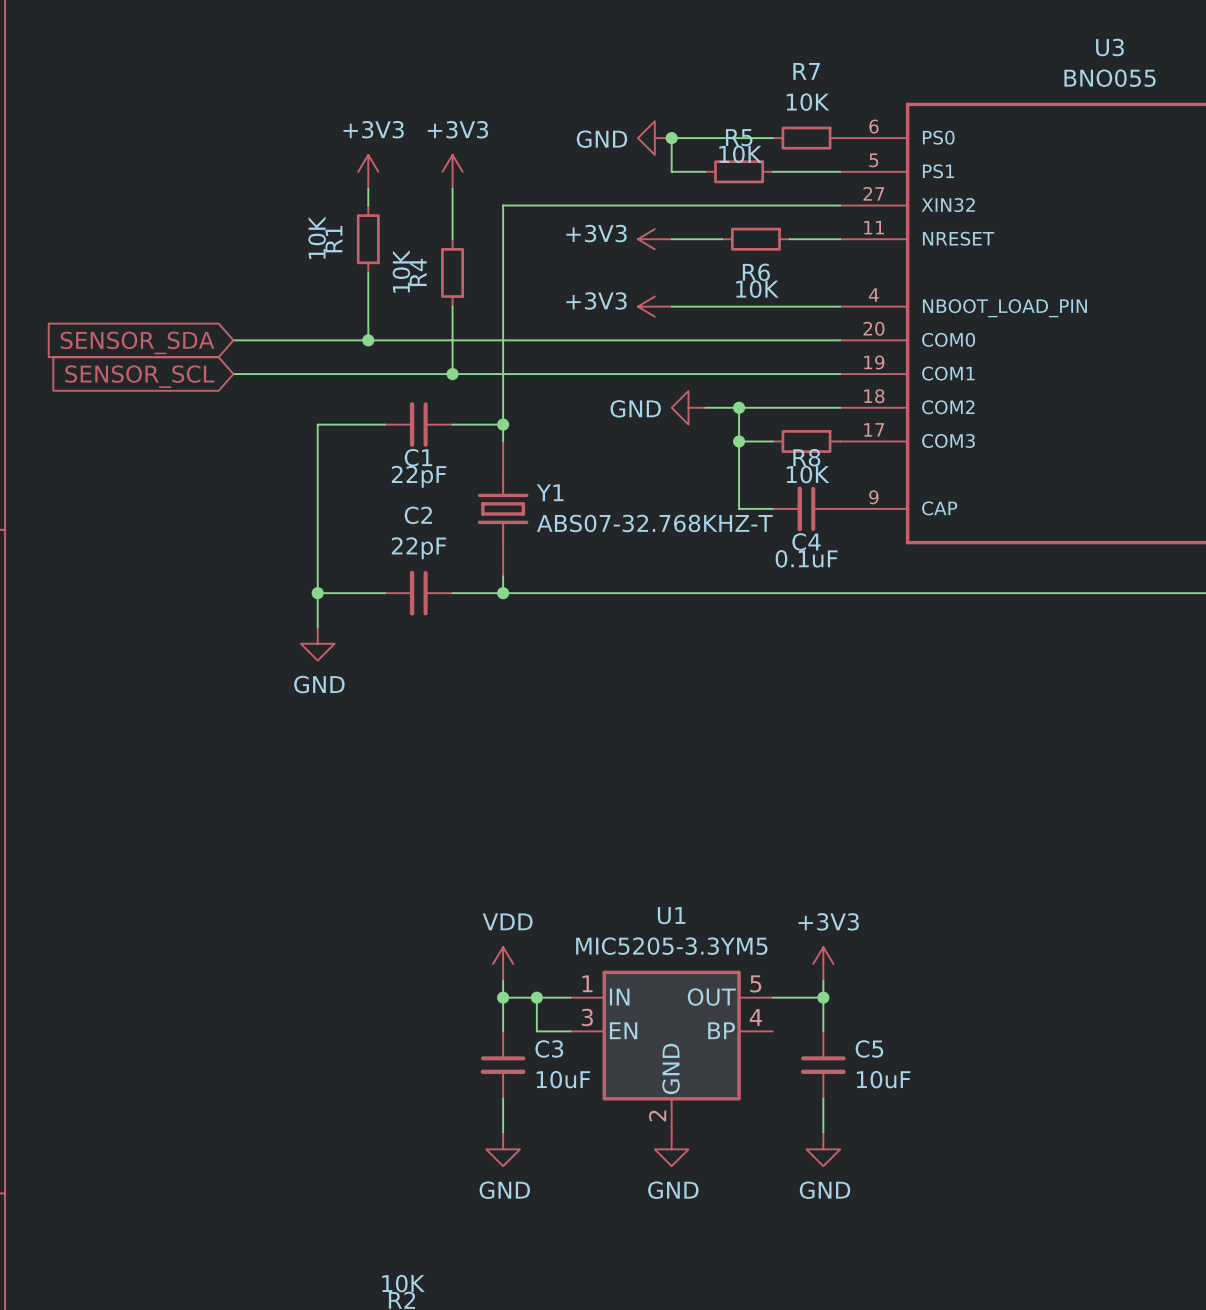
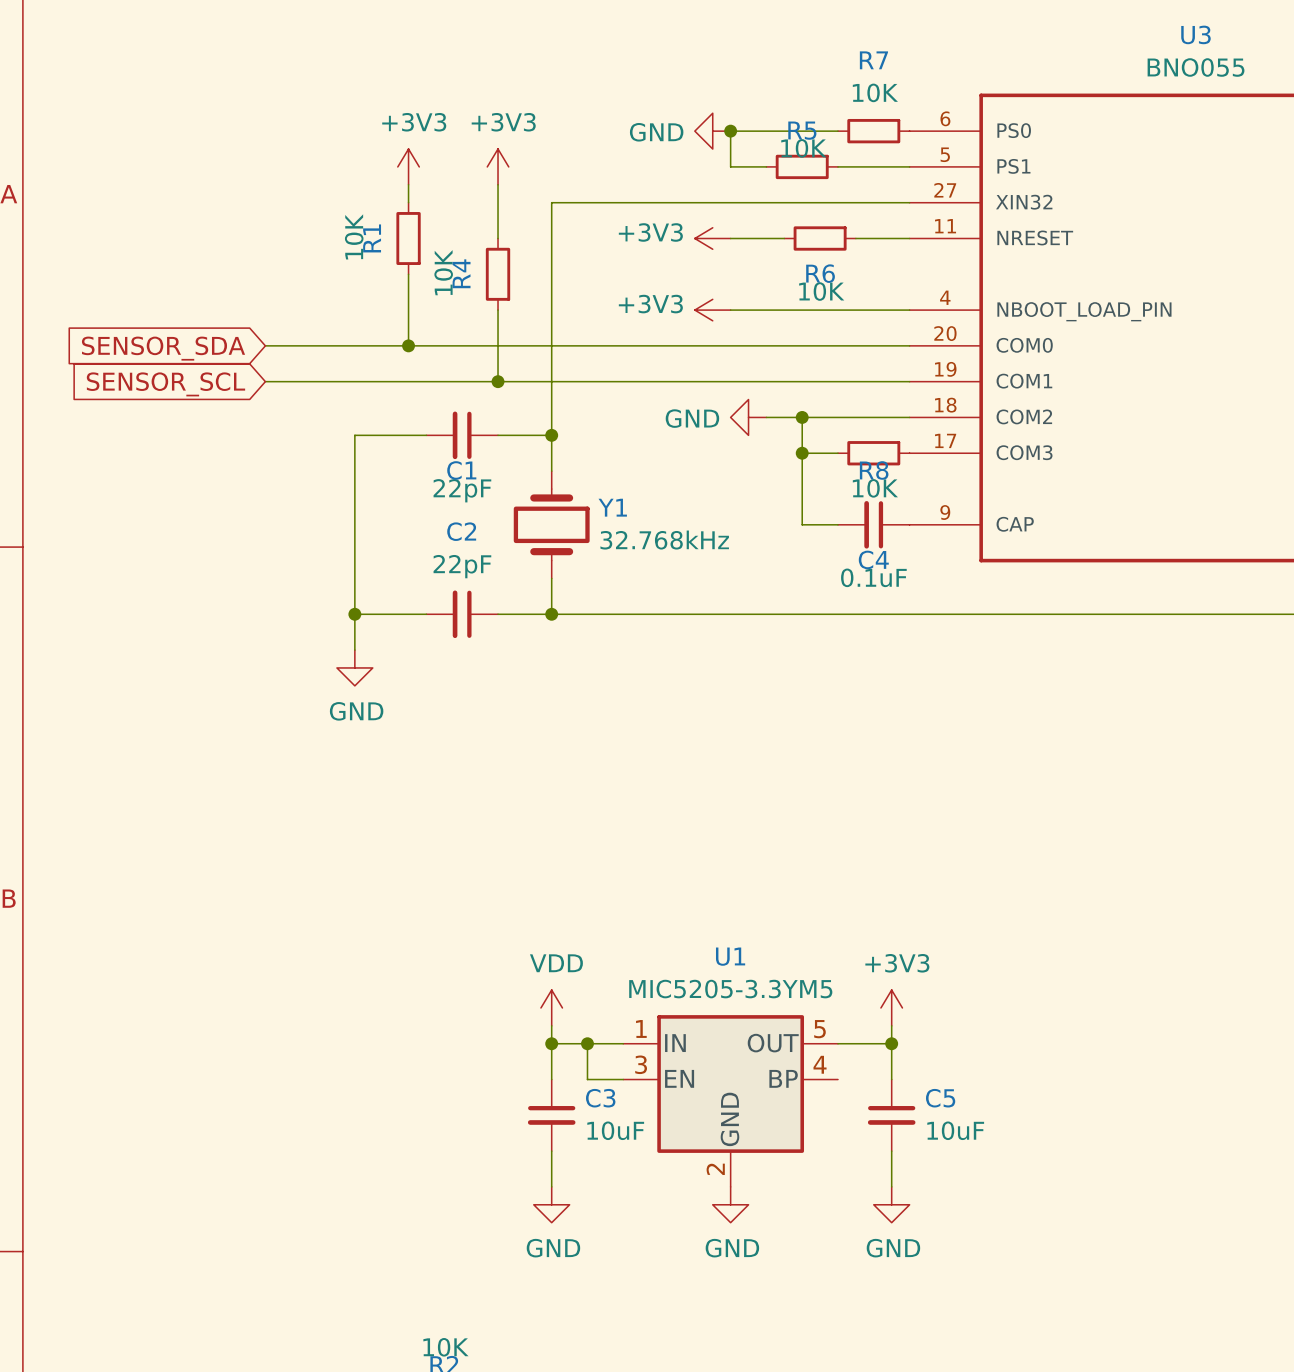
Y1 symbol: [477, 441, 529, 577] -> [513, 471, 590, 579]
Y1 value: ABS07-32.768KHZ-T (654, 523) -> 32.768kHz (664, 540)

